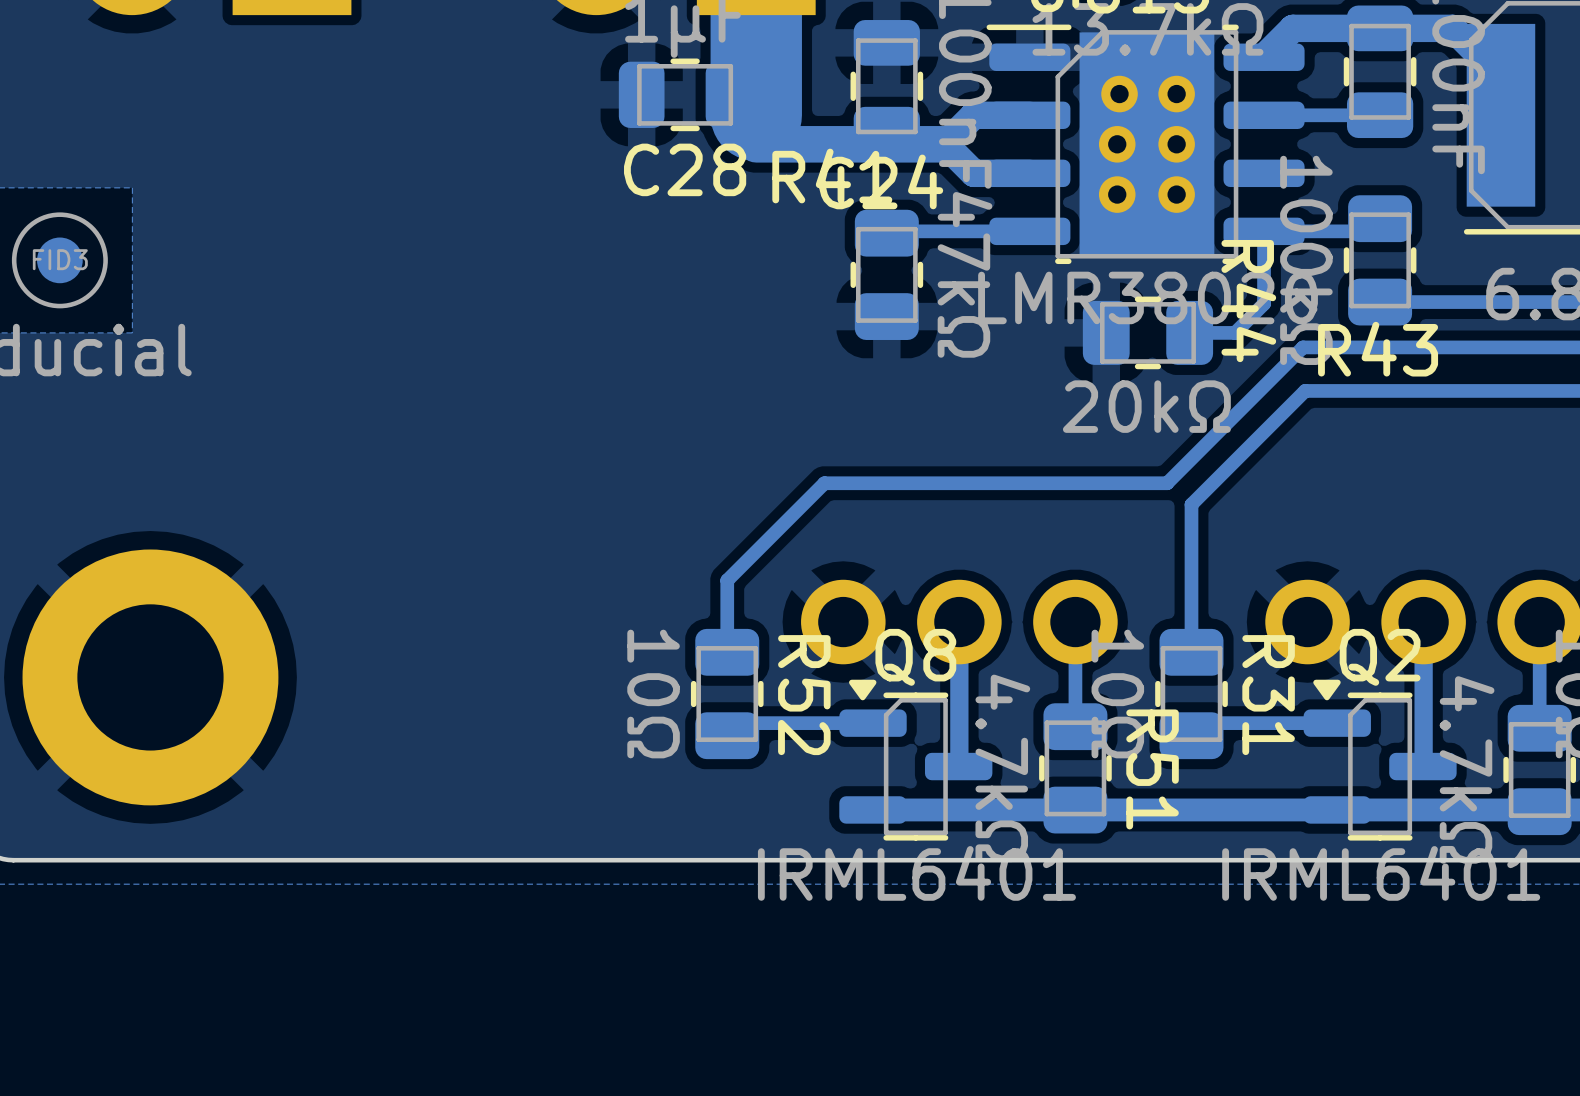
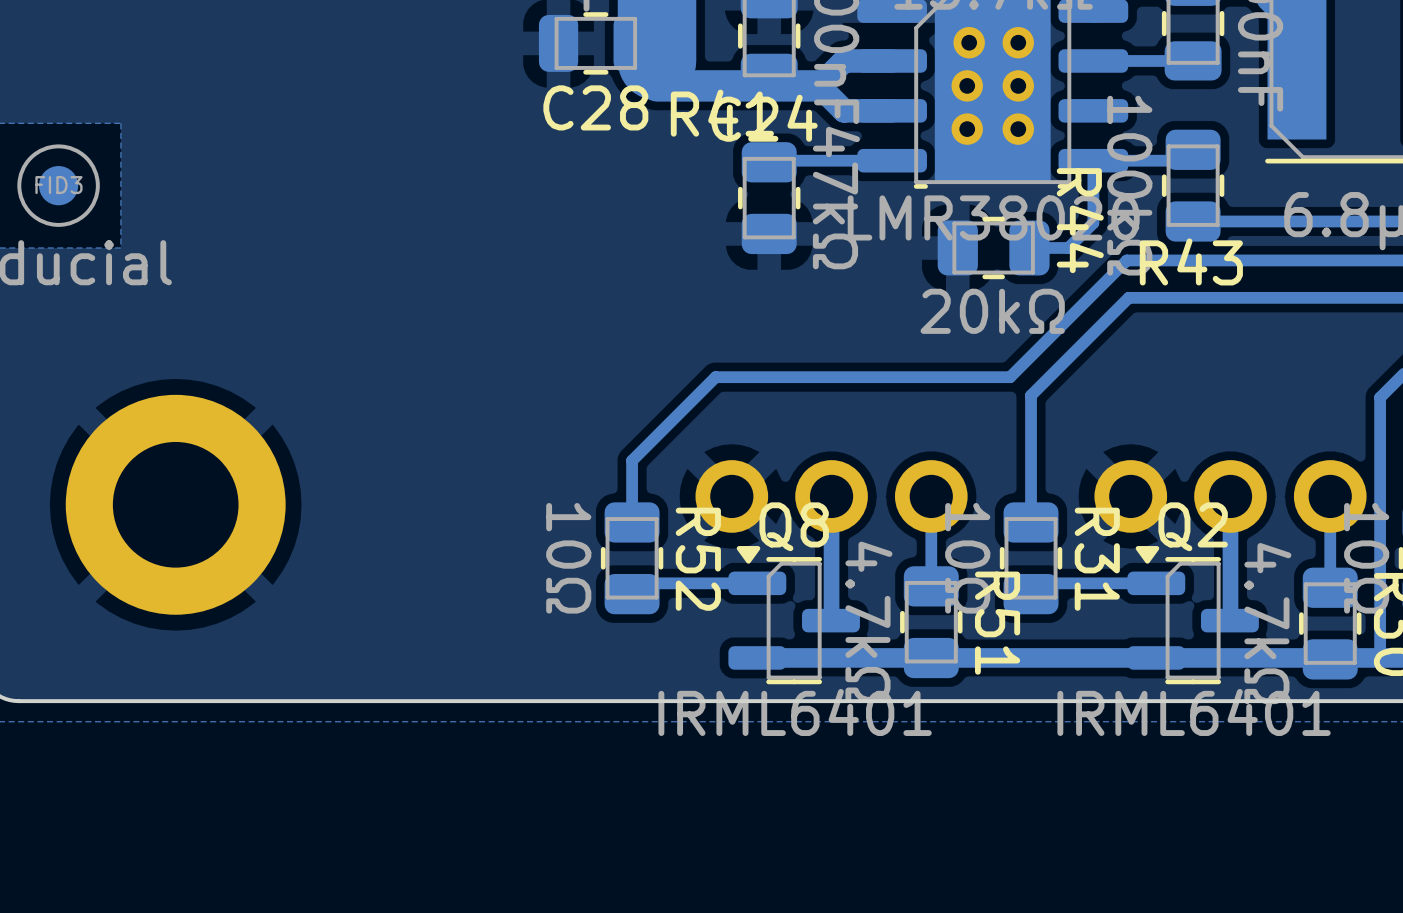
part position: (150, 677) -> (175, 504)

